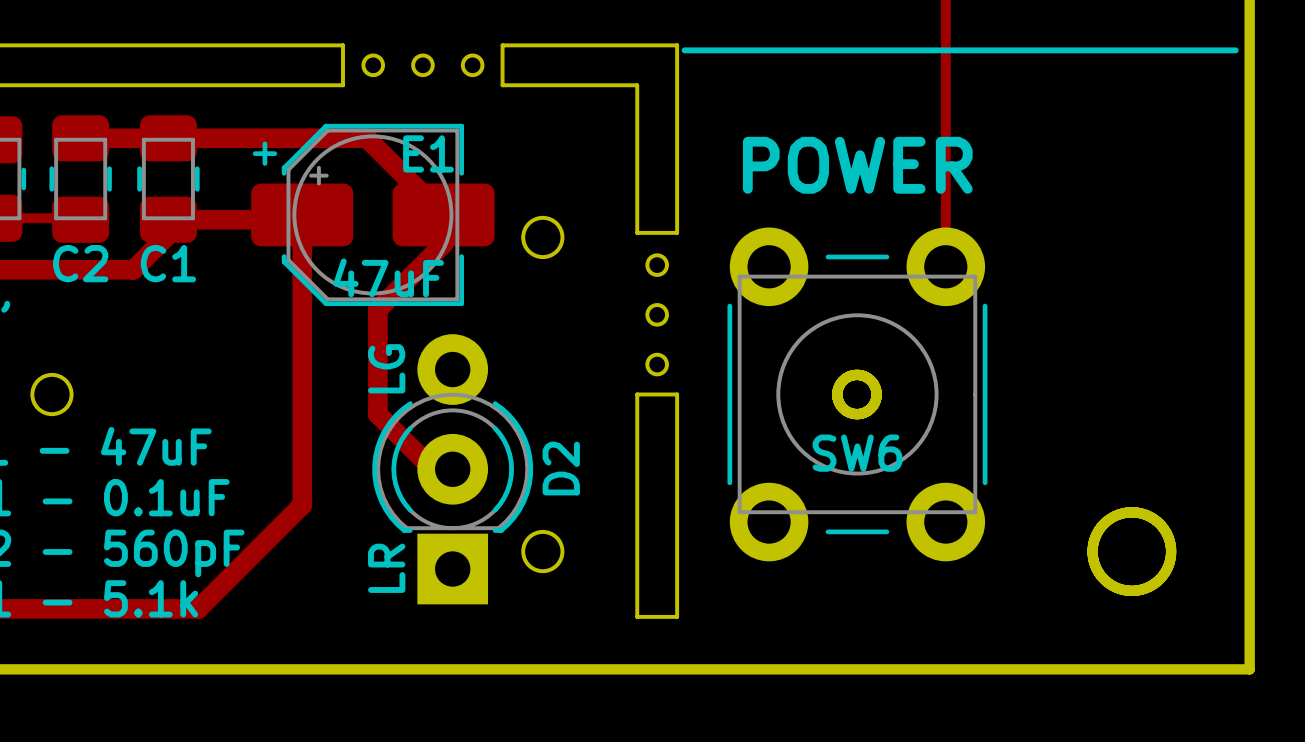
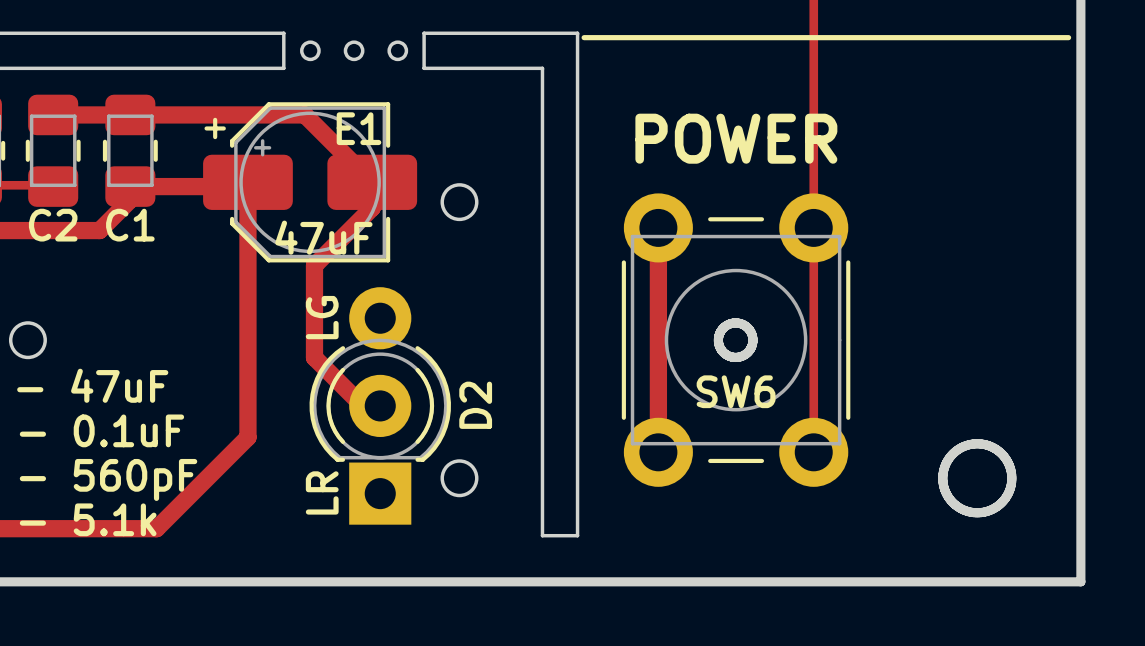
board edge: (637, 232) (677, 232) -> (542, 198) (542, 340)
round board edge: [645, 253, 669, 277] -> none
track: none -> (658, 227) (658, 452)
track: none -> (813, 227) (813, 452)
round board edge: [645, 303, 669, 327] -> none
round board edge: [645, 352, 669, 377] -> none
board edge: (637, 394) (677, 394) -> (577, 198) (577, 340)

